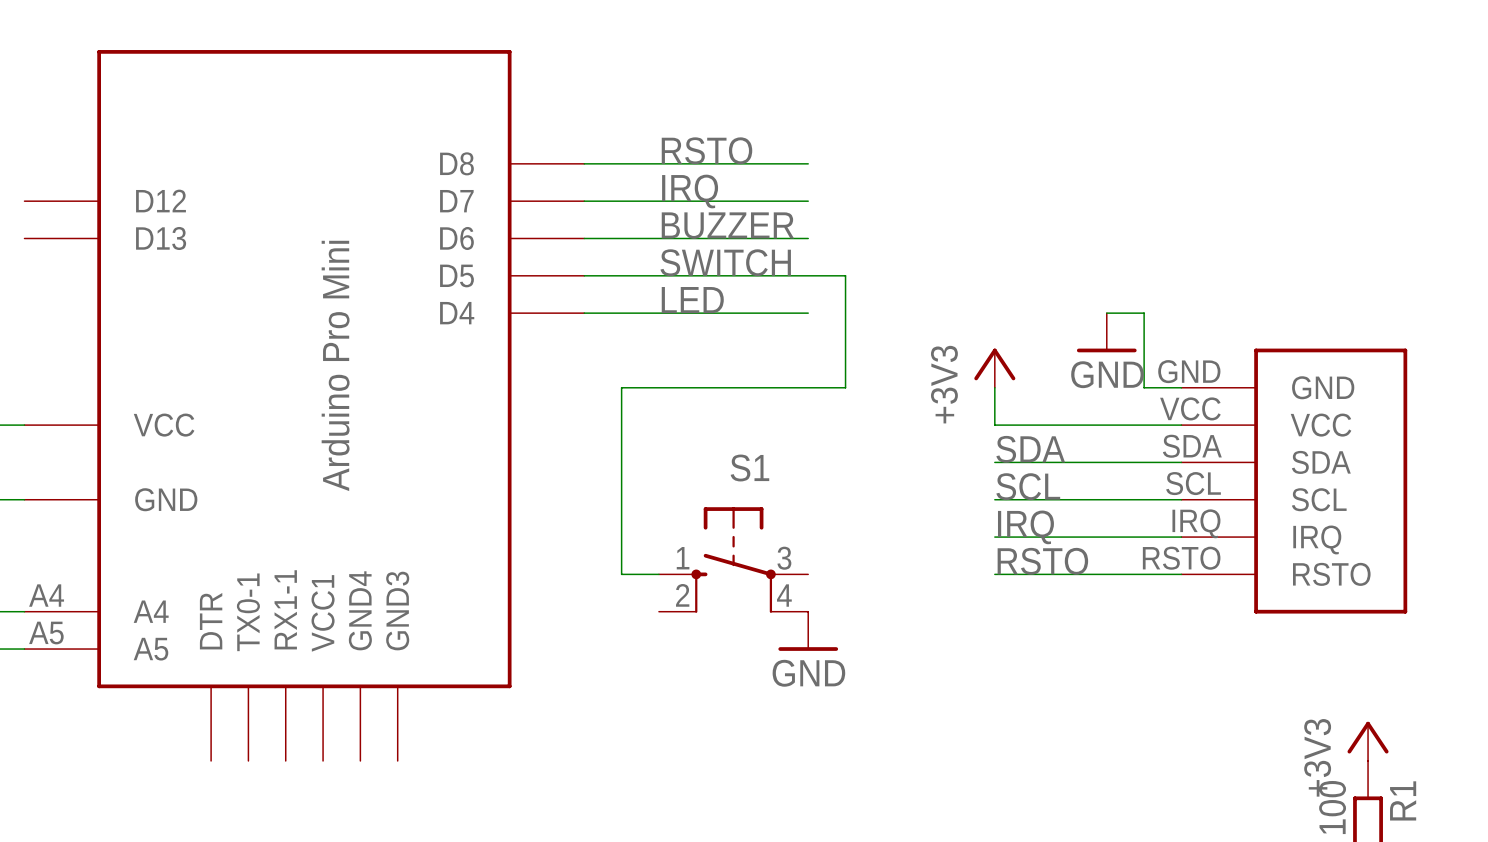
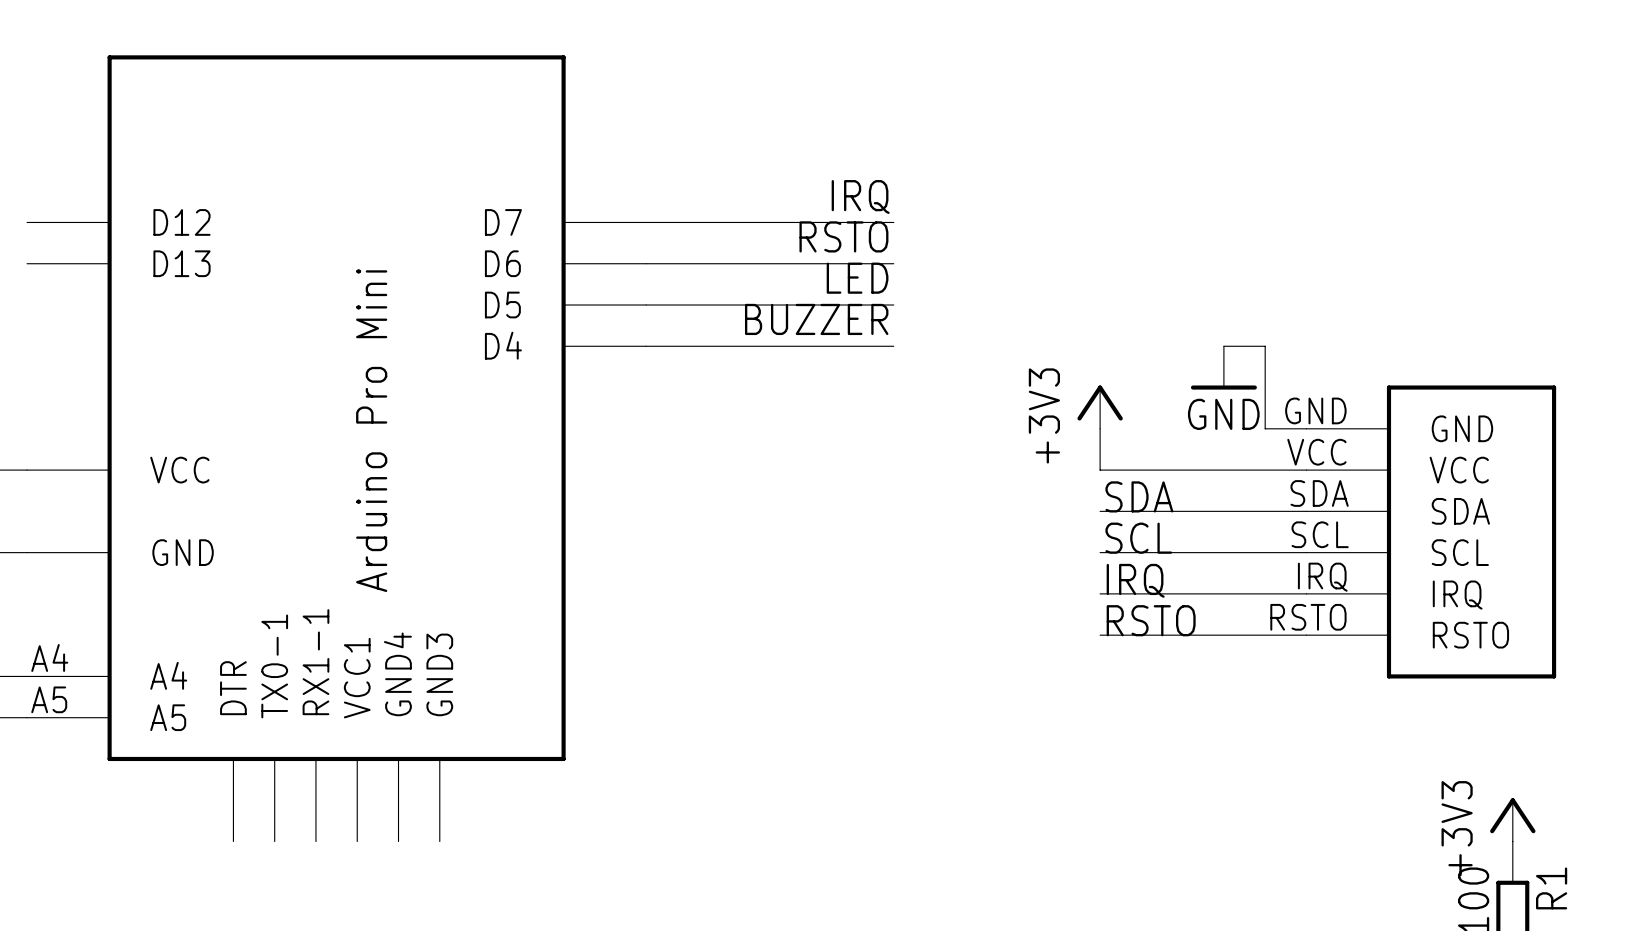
part symbol: [24, 50, 585, 761] -> [27, 55, 647, 842]
label position: RSTO (706, 150) -> RSTO (843, 236)
wire: (584, 163) (808, 163) -> none
label position: IRQ (690, 191) -> IRQ (860, 197)
label position: BUZZER (727, 225) -> BUZZER (816, 319)
label: SWITCH (725, 262) -> none
wire: (808, 275) (845, 275) (845, 387) (621, 387) (621, 574) (658, 574) -> none
label position: LED (692, 300) -> LED (857, 278)
S1: (733, 560) -> none
power symbol: GND (808, 631) -> none

